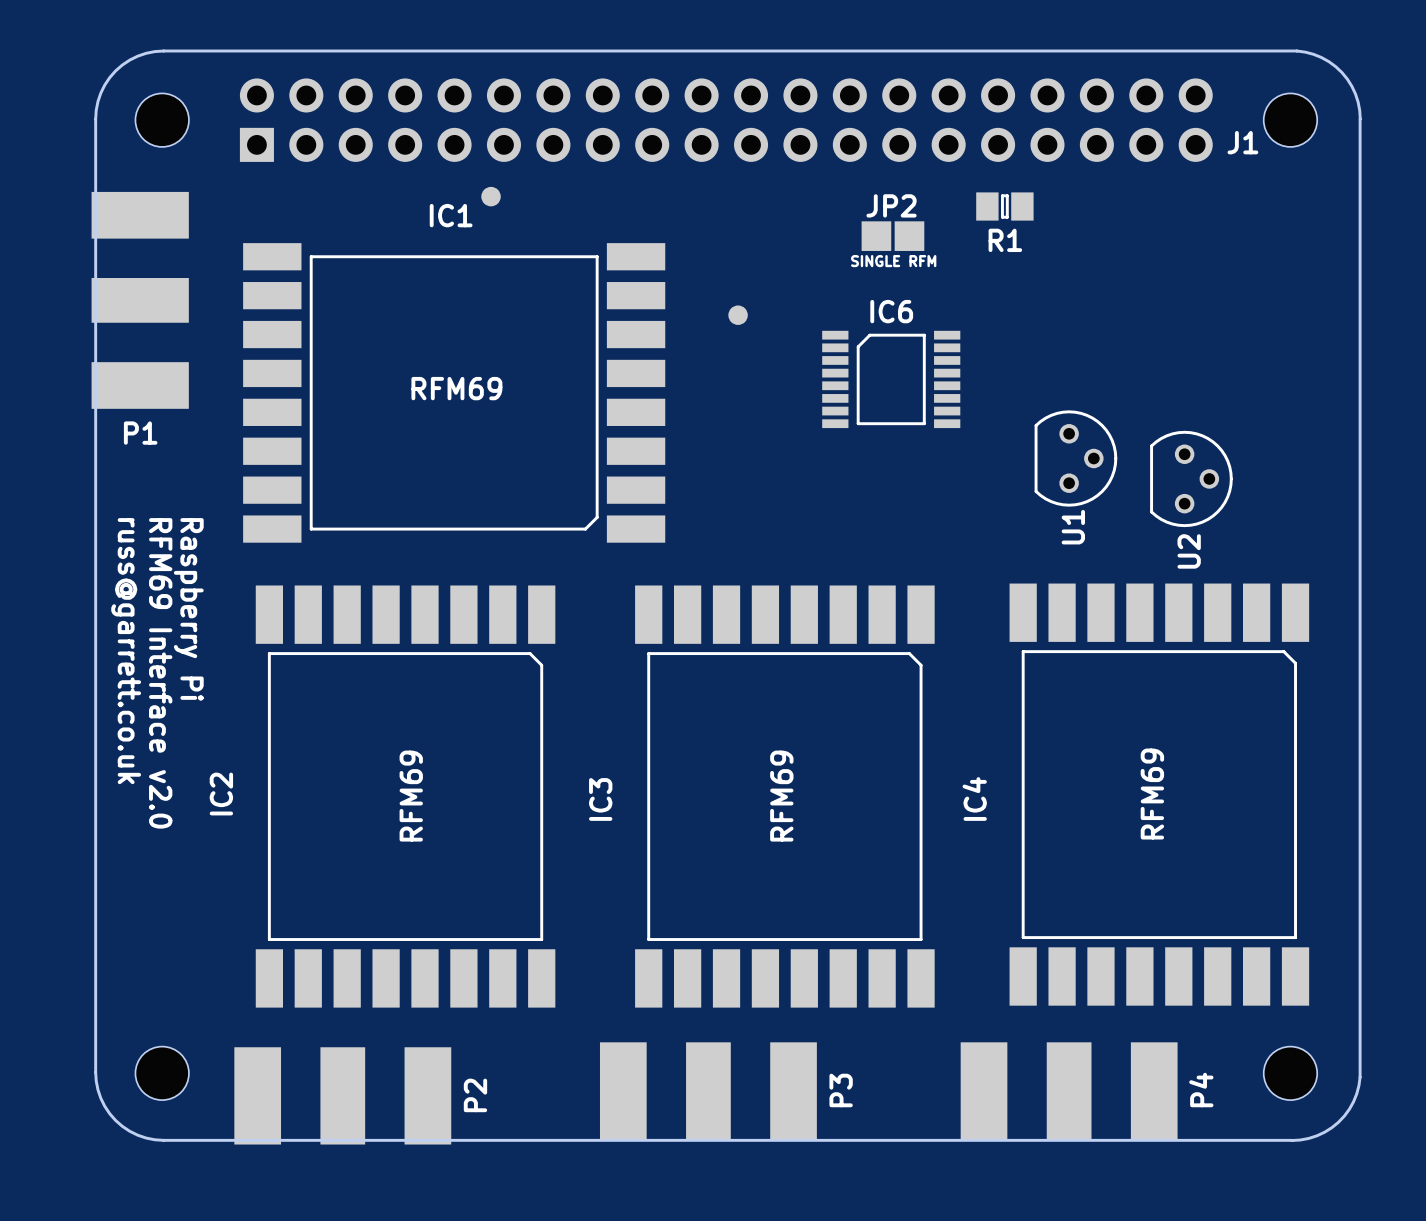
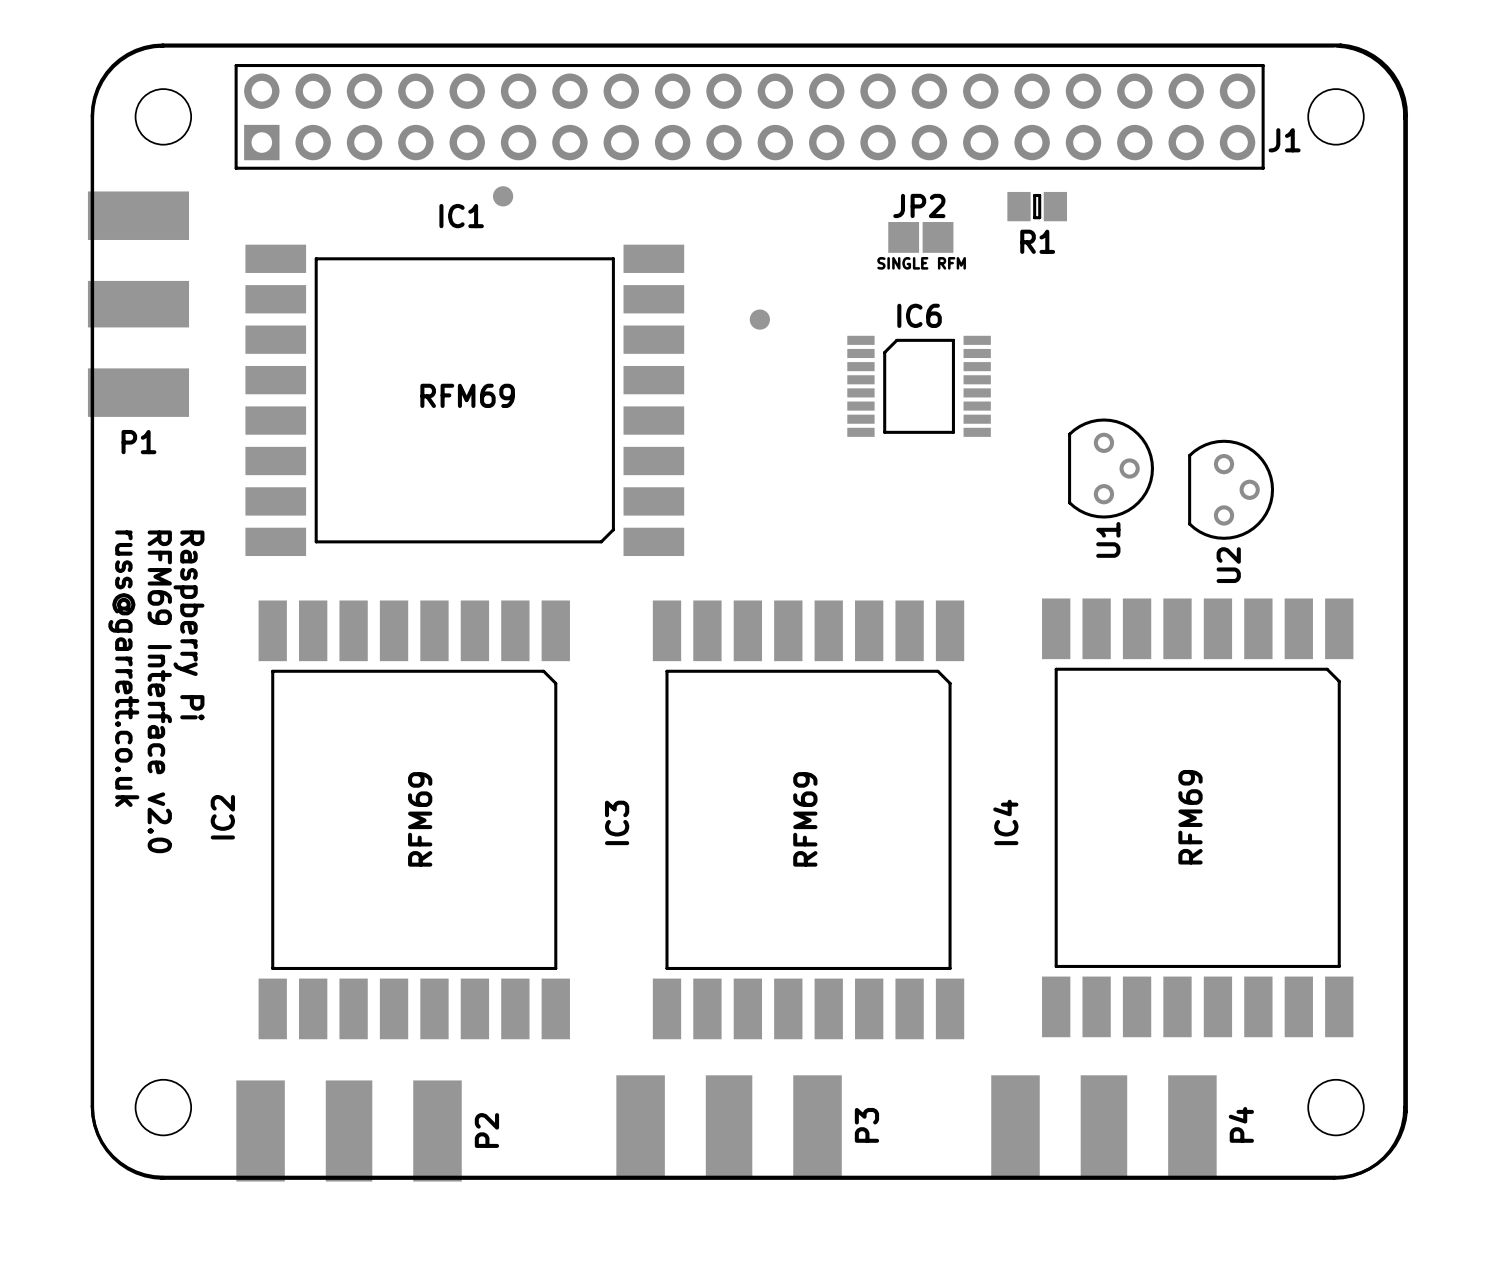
J1 footprint: [135, 78, 1318, 1101] -> [91, 44, 1407, 1180]

